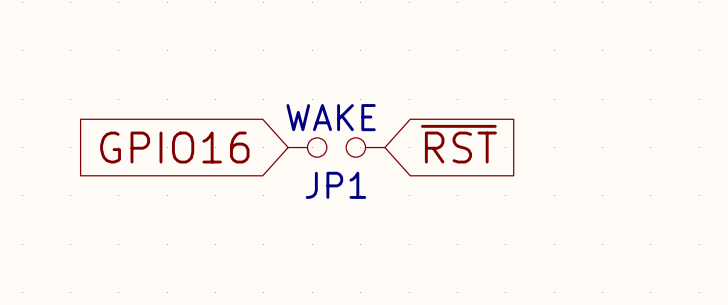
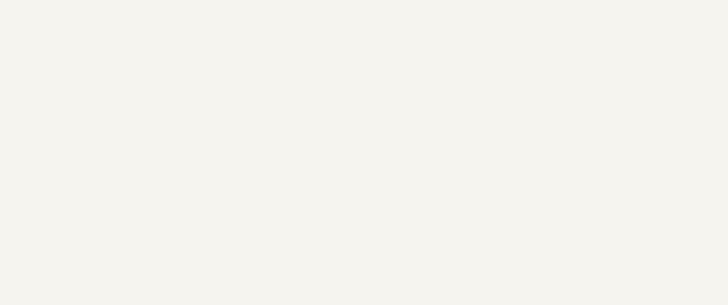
global label: ~{RST} (458, 144) -> none
global label: GPIO16 (174, 147) -> none
JP1: WAKE (336, 147) -> none

